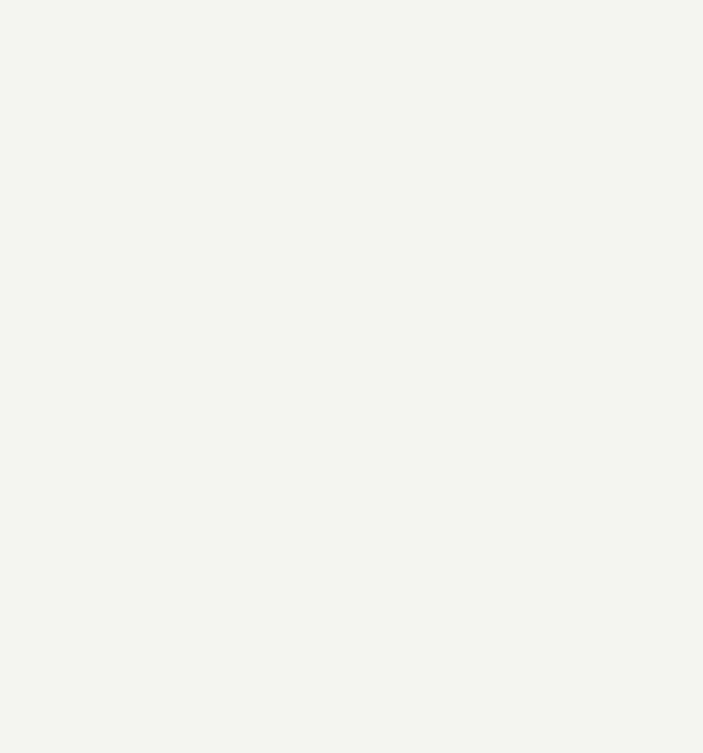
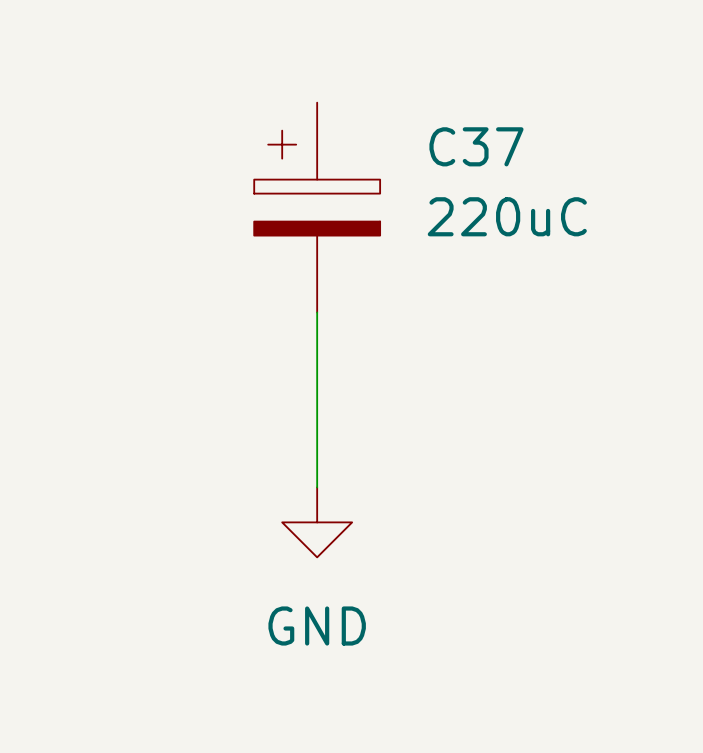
C37: none -> 220uC (317, 207)
wire: none -> (317, 312) (317, 487)
power symbol: none -> GND (317, 522)

